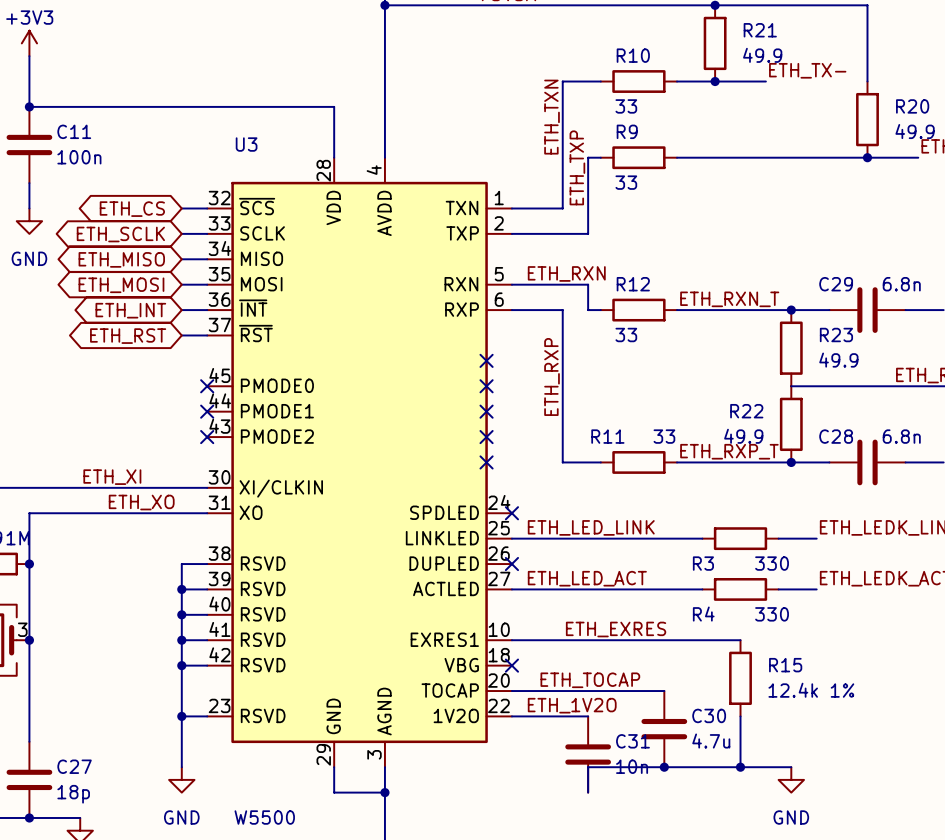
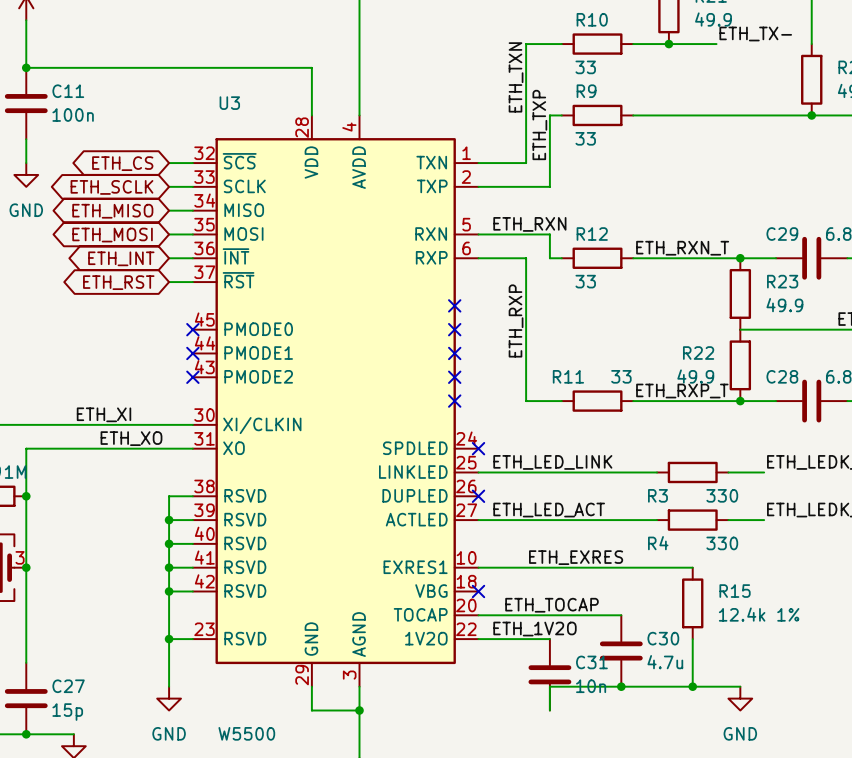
C27 value: 18p (73, 794) -> 15p (67, 712)

